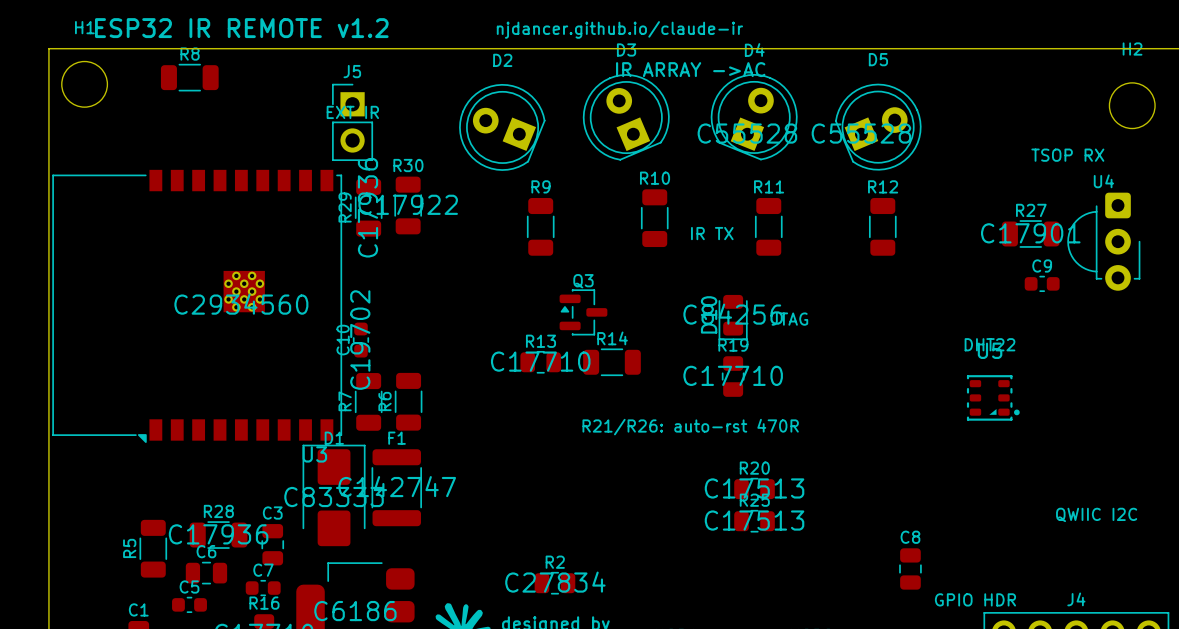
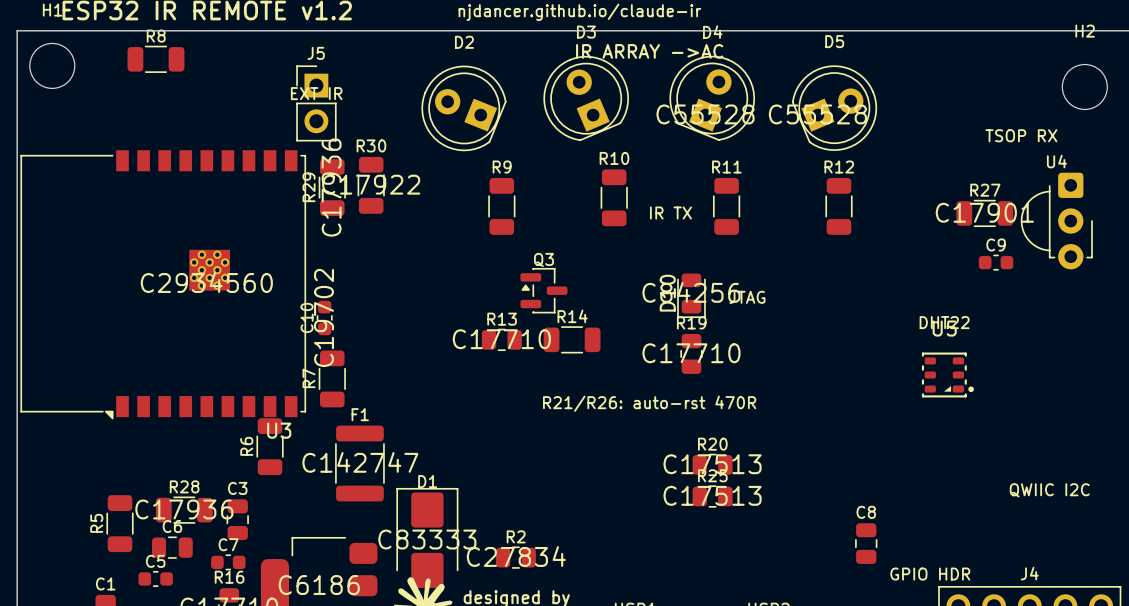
R6 position: (408, 401) -> (270, 446)
D1 position: (334, 495) -> (427, 537)

